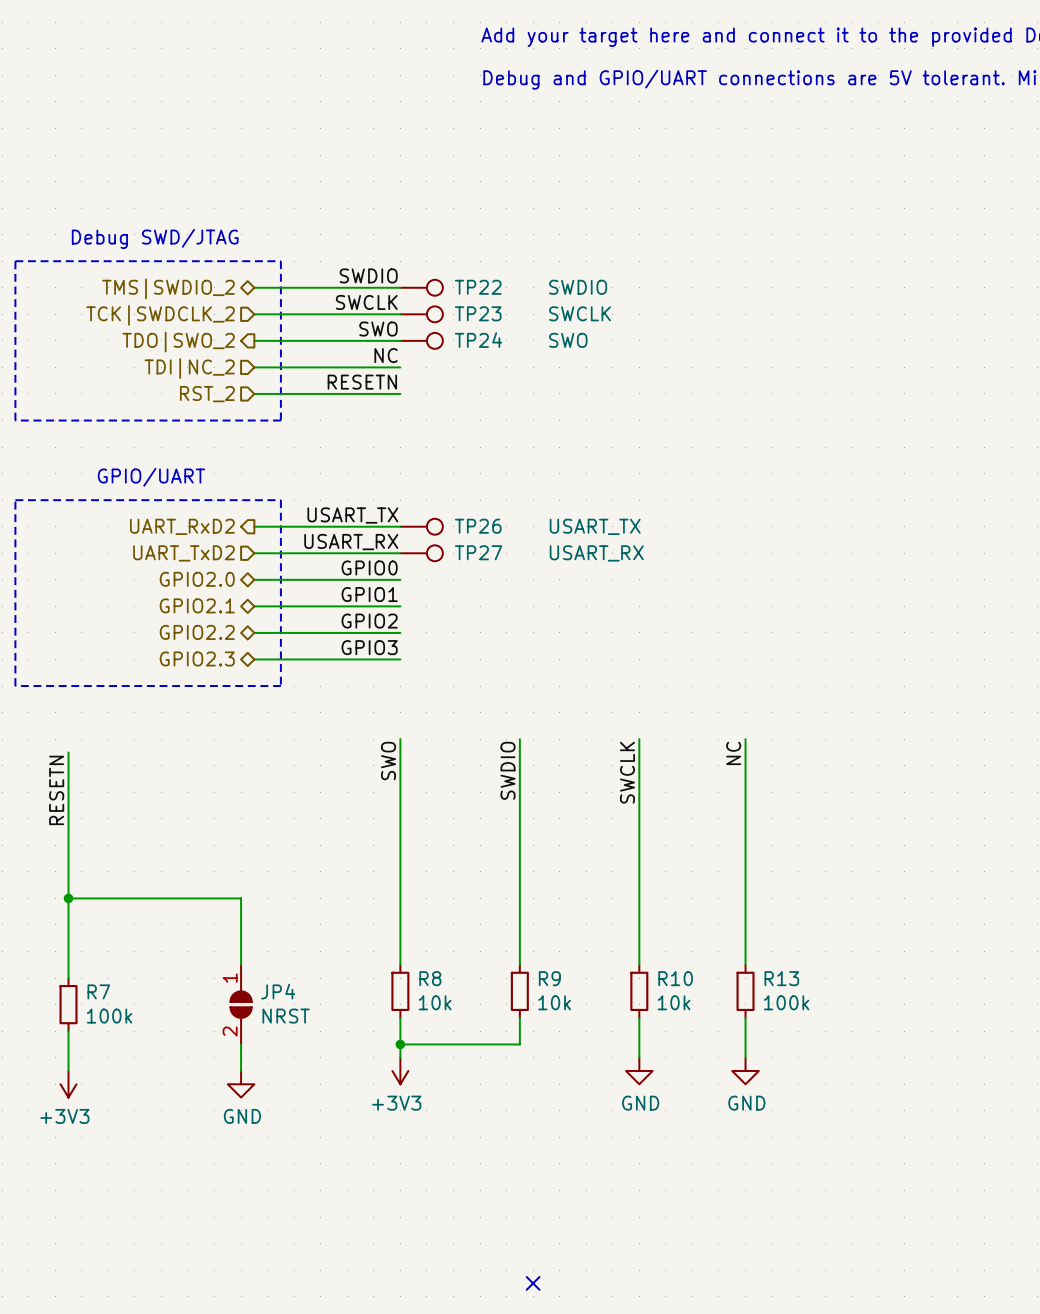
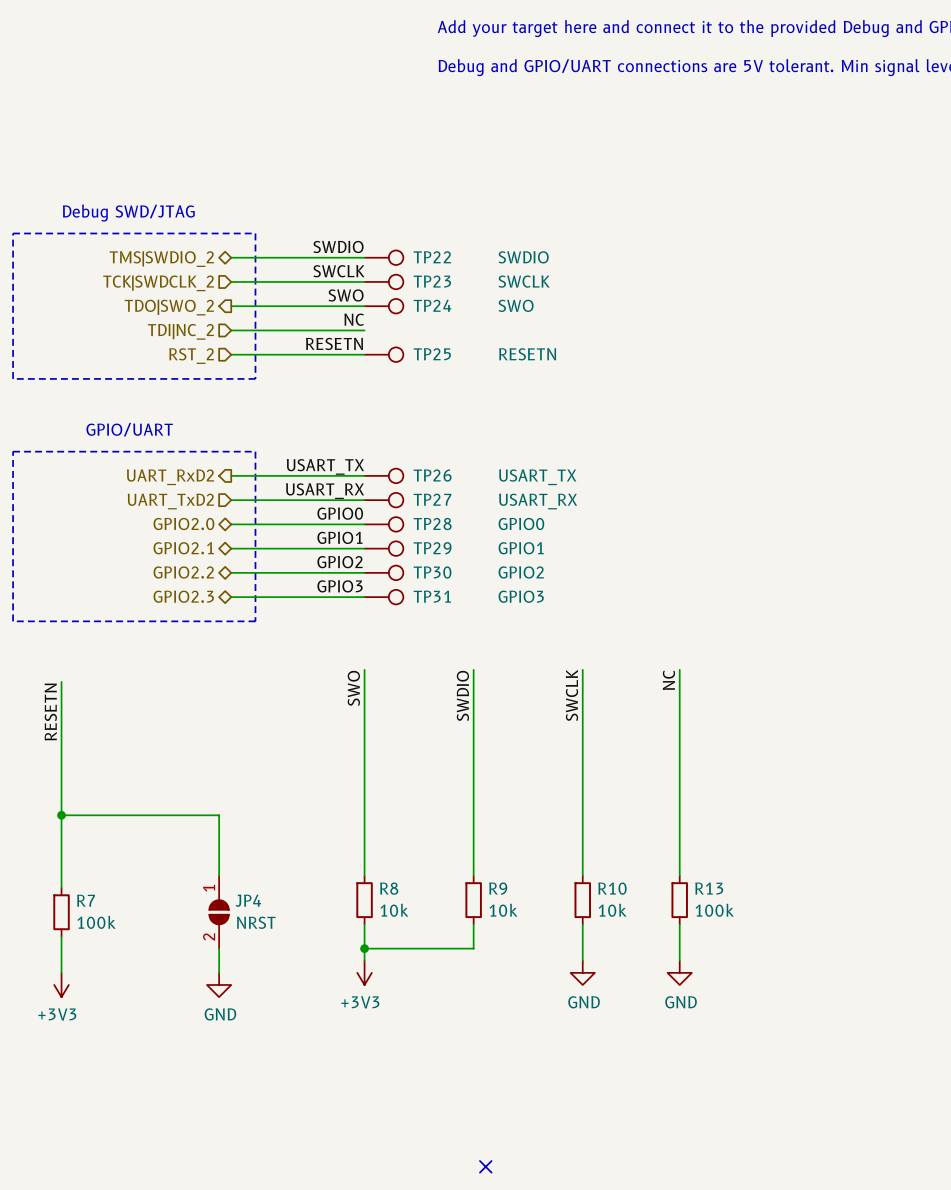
TP25: none -> RESETN (383, 354)
TP28: none -> GPIO0 (383, 524)
TP29: none -> GPIO1 (383, 548)
TP30: none -> GPIO2 (383, 572)
TP31: none -> GPIO3 (383, 597)

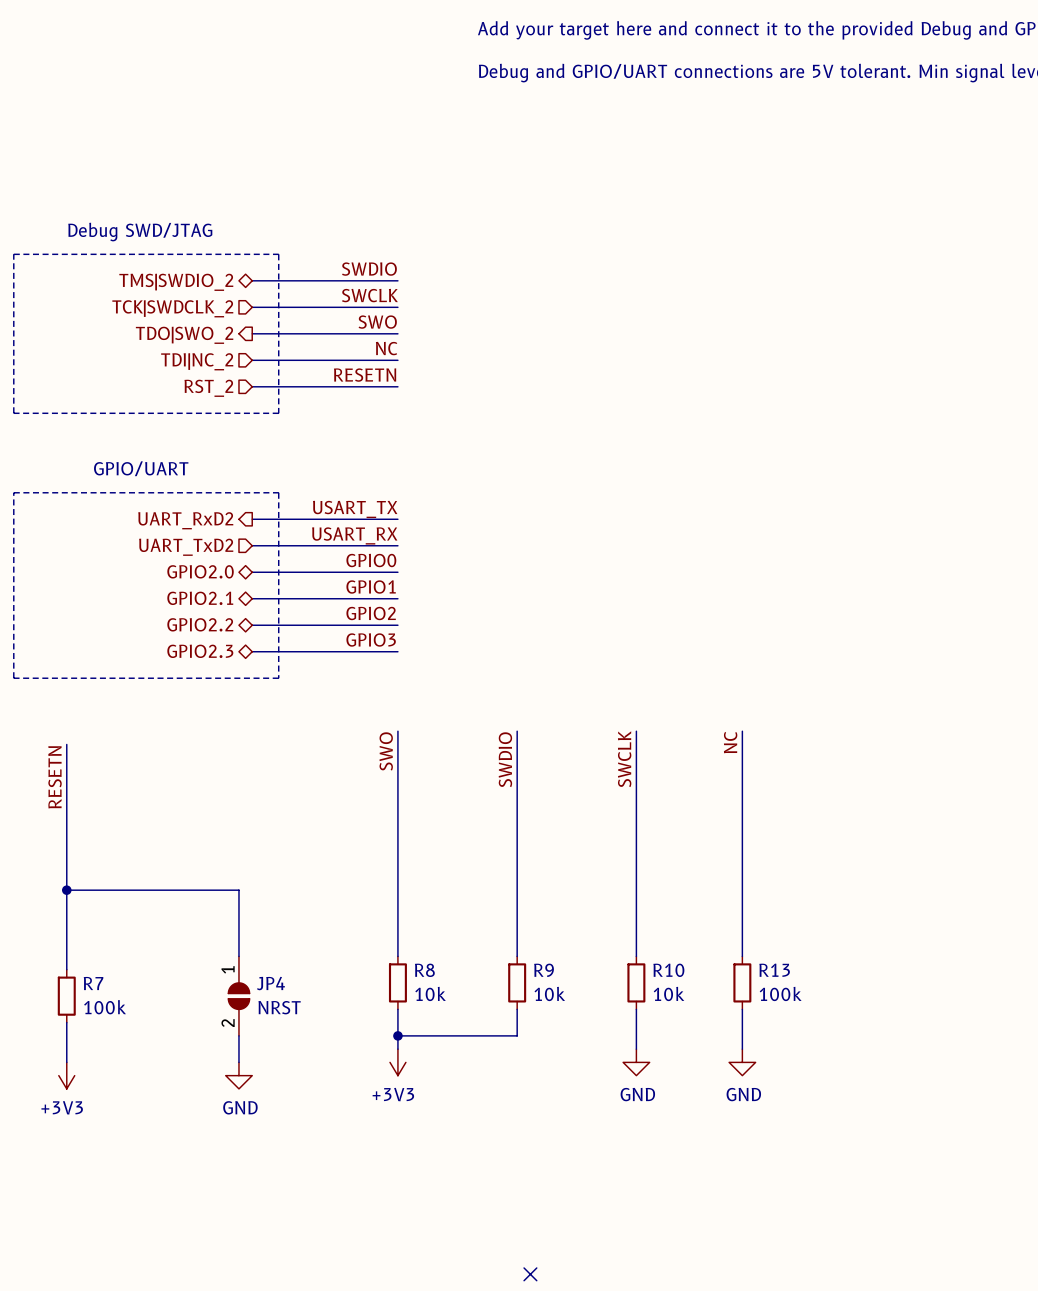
TP22: SWDIO (383, 257) -> none
TP23: SWCLK (383, 281) -> none
TP24: SWO (383, 306) -> none
TP25: RESETN (383, 354) -> none
TP26: USART_TX (383, 475) -> none
TP27: USART_RX (383, 500) -> none
TP28: GPIO0 (383, 524) -> none
TP29: GPIO1 (383, 548) -> none
TP30: GPIO2 (383, 572) -> none
TP31: GPIO3 (383, 597) -> none

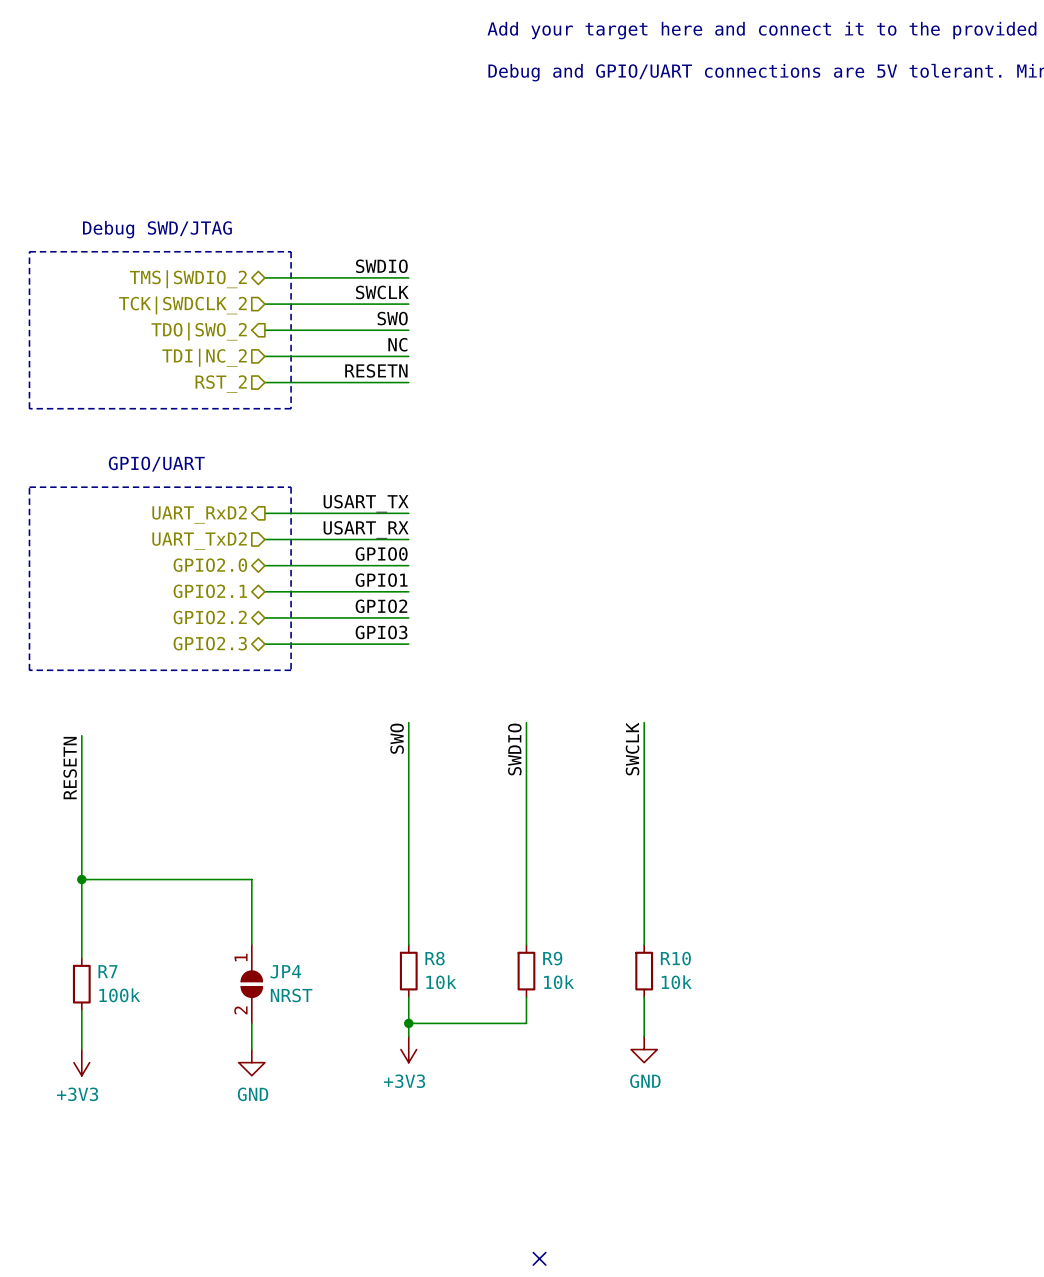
wire: (742, 731) (742, 956) -> none
label: NC (730, 742) -> none
R13: 100k (742, 982) -> none
wire: (742, 1009) (742, 1049) -> none
power symbol: GND (742, 1062) -> none

